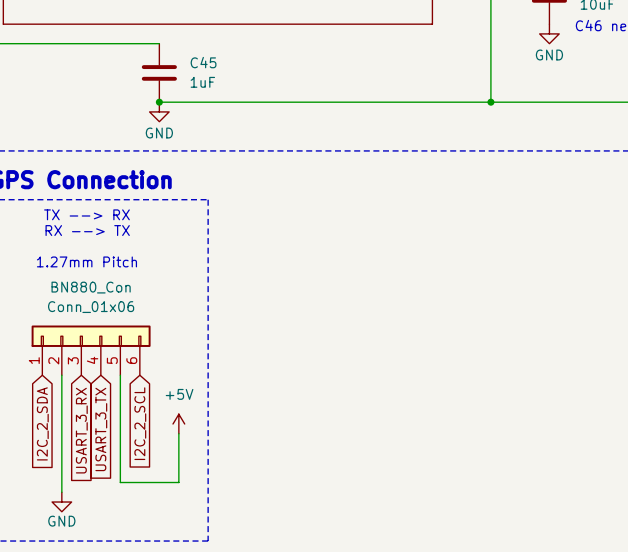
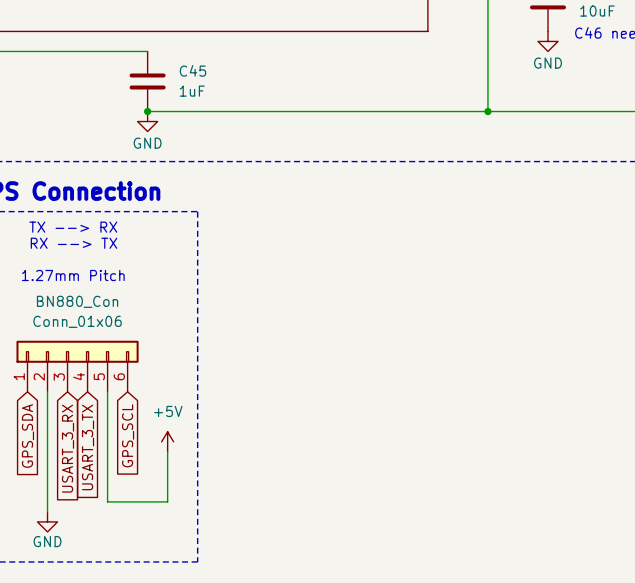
global label: I2C_2_SDA (42, 423) -> GPS_SDA (27, 436)
global label: I2C_2_SCL (140, 423) -> GPS_SCL (128, 435)

